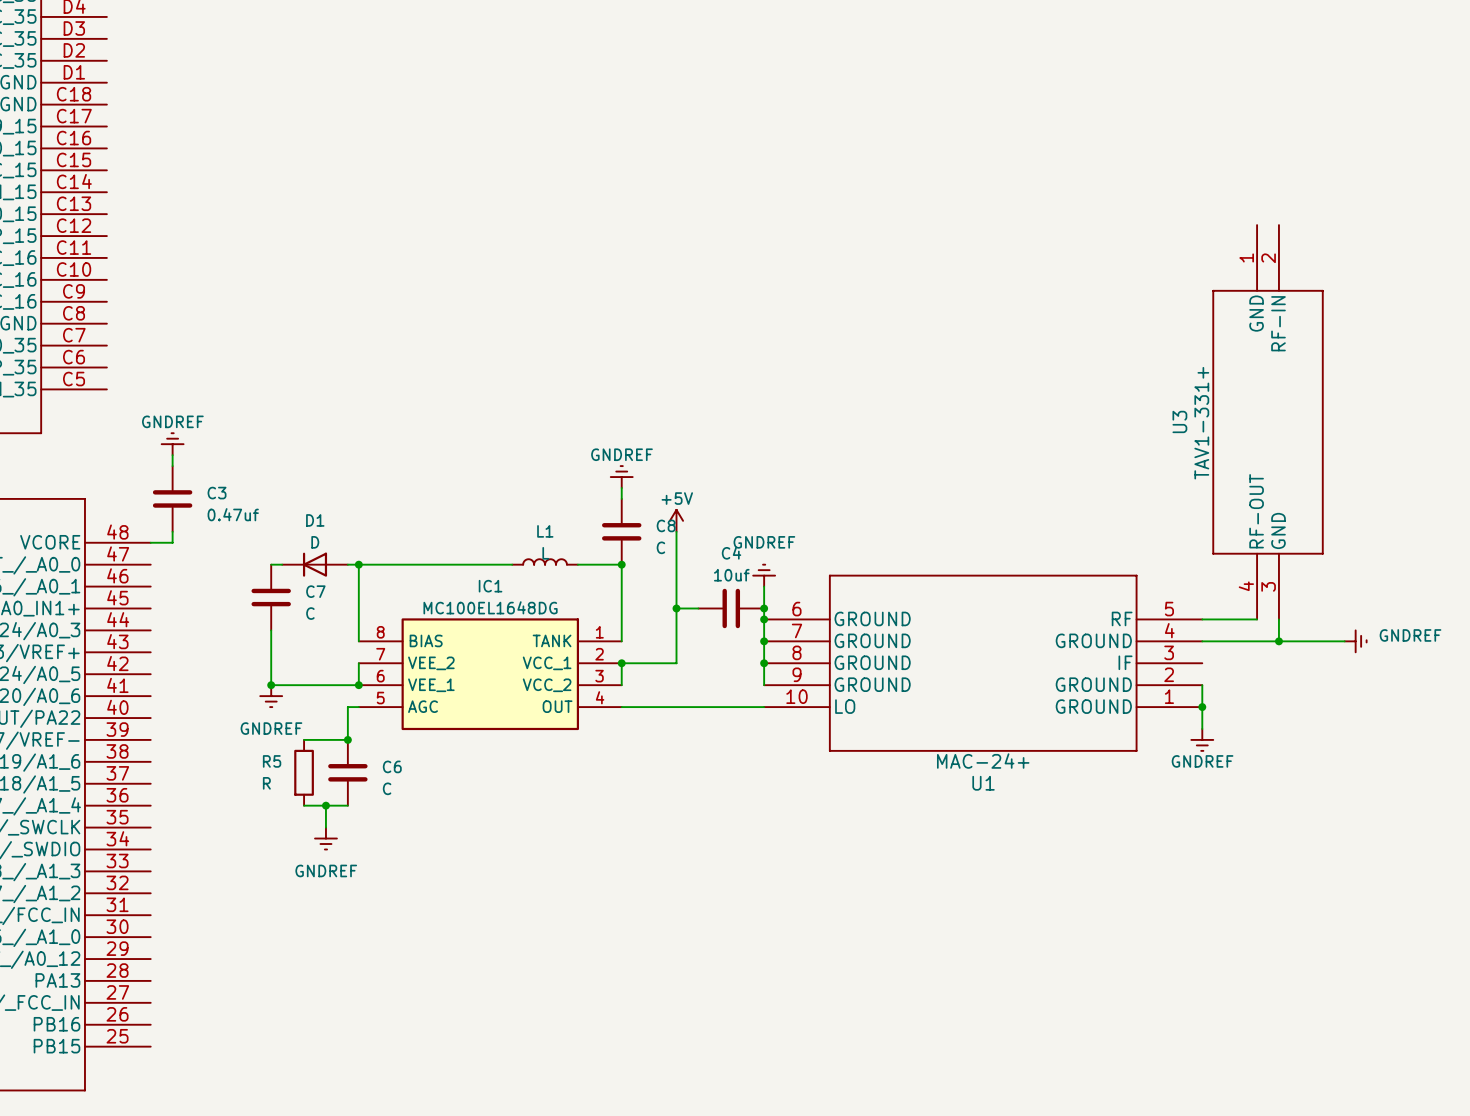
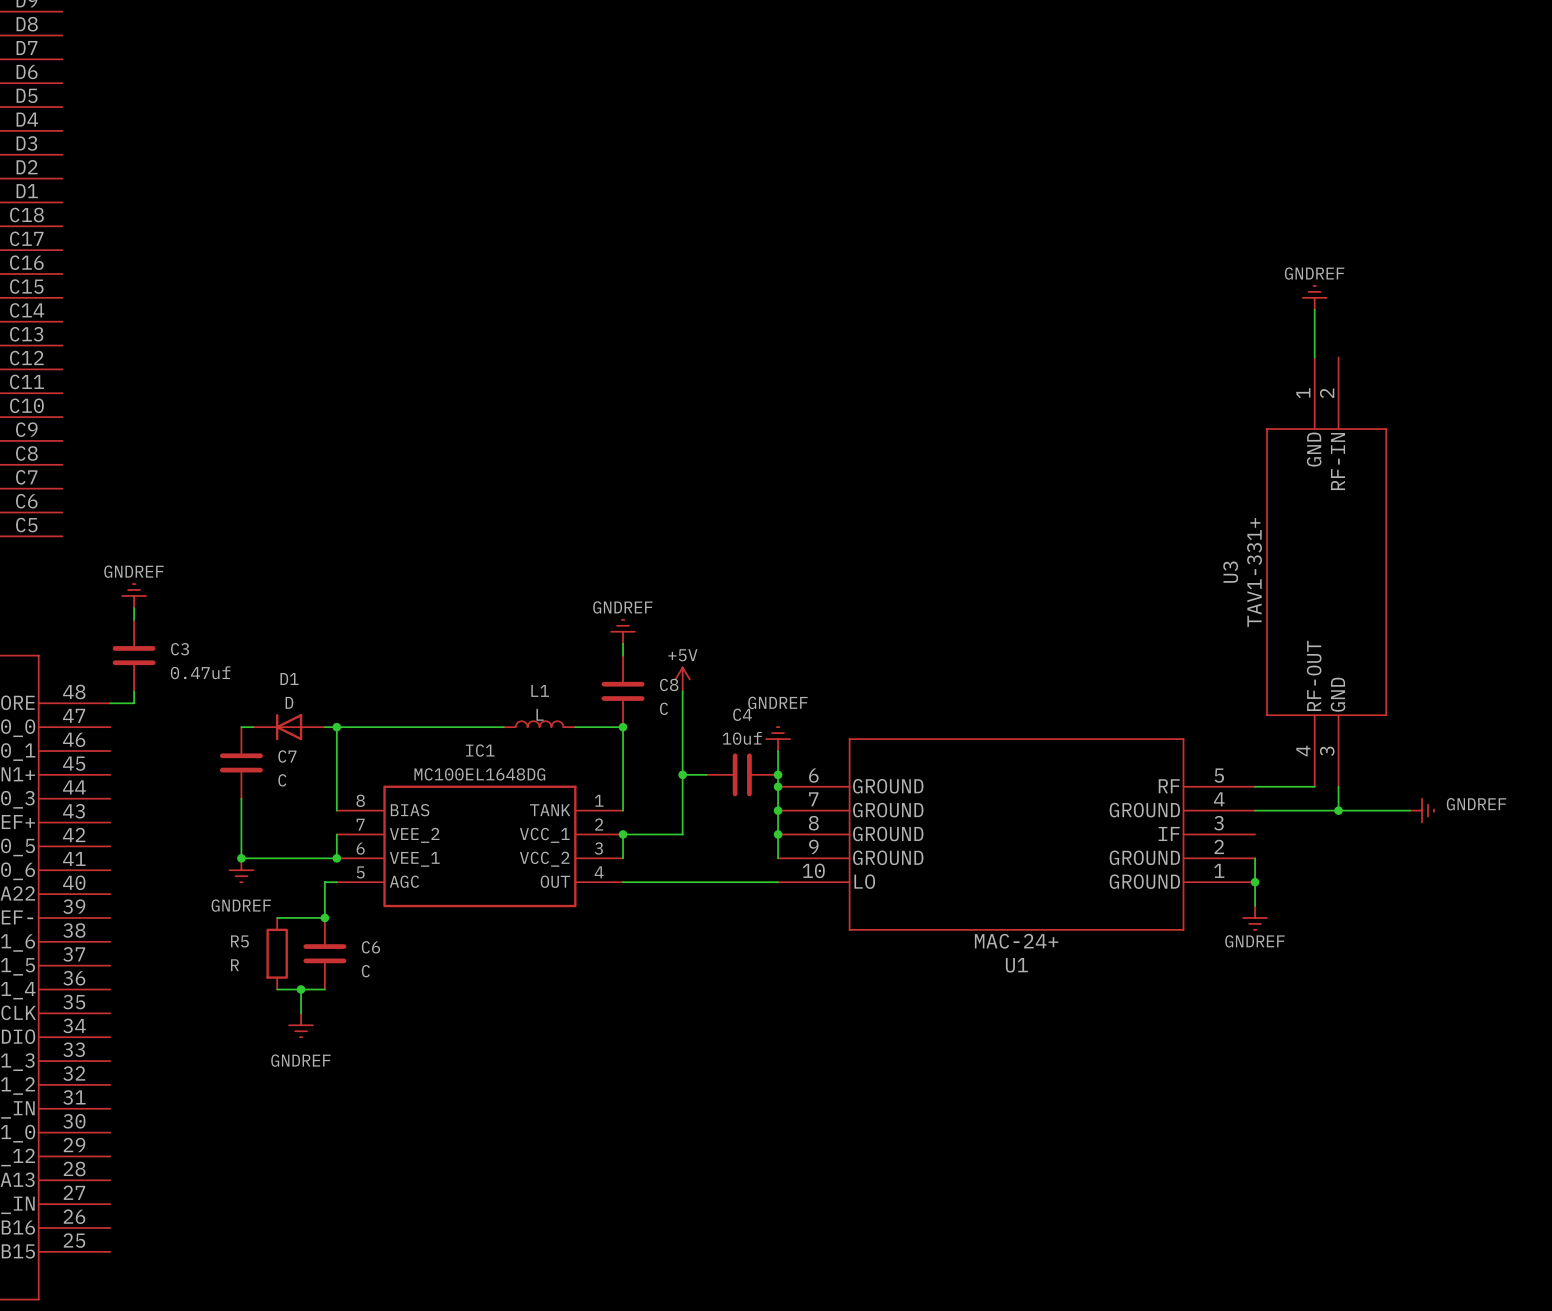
power symbol: none -> GNDREF (1314, 297)
wire: none -> (1314, 309) (1314, 357)

